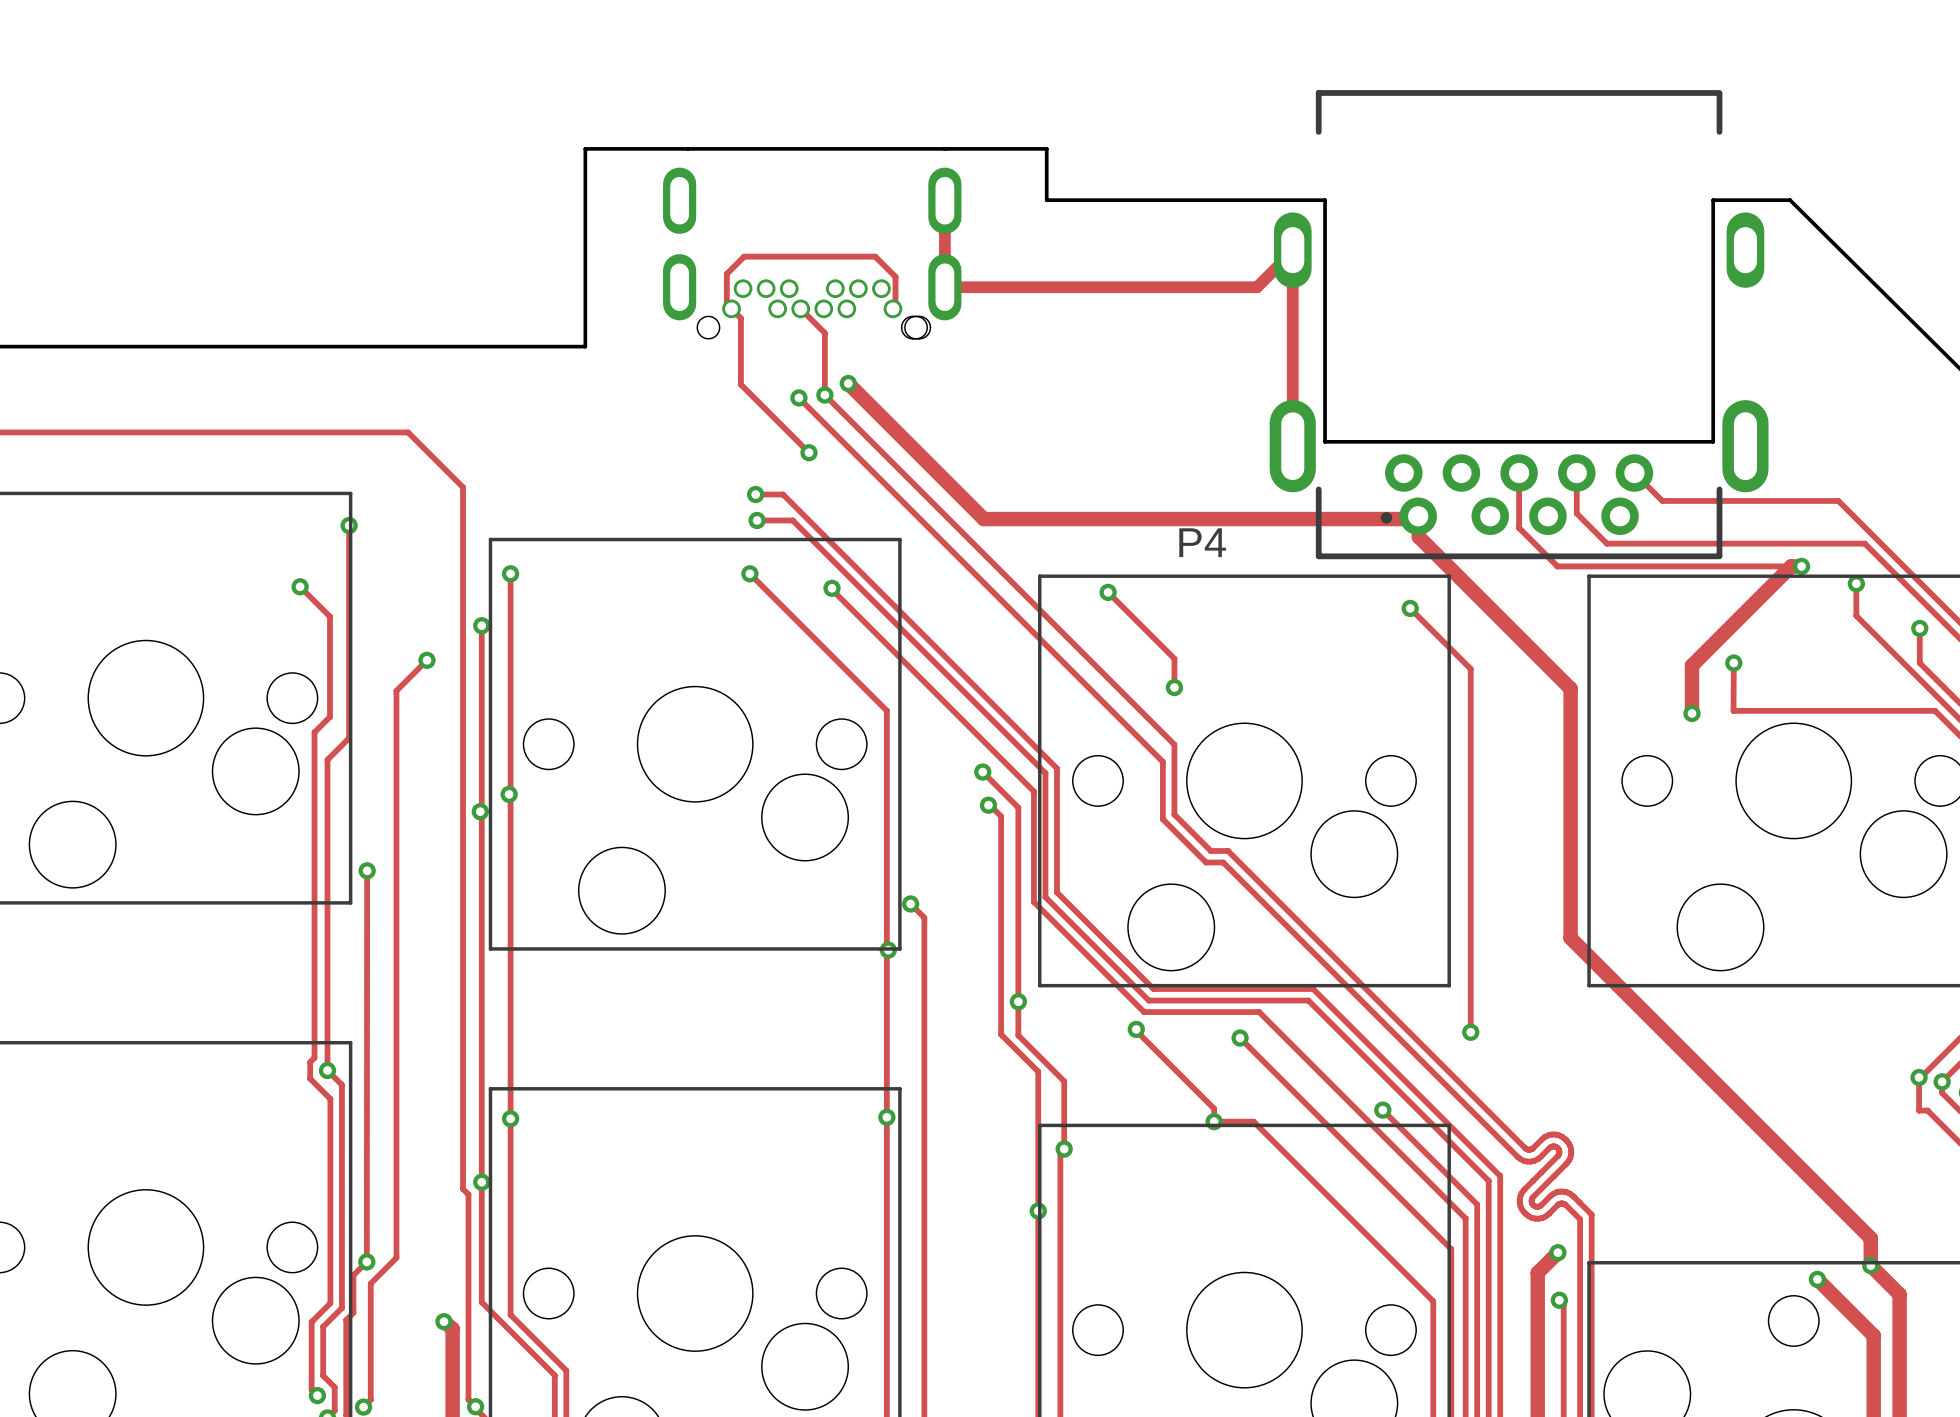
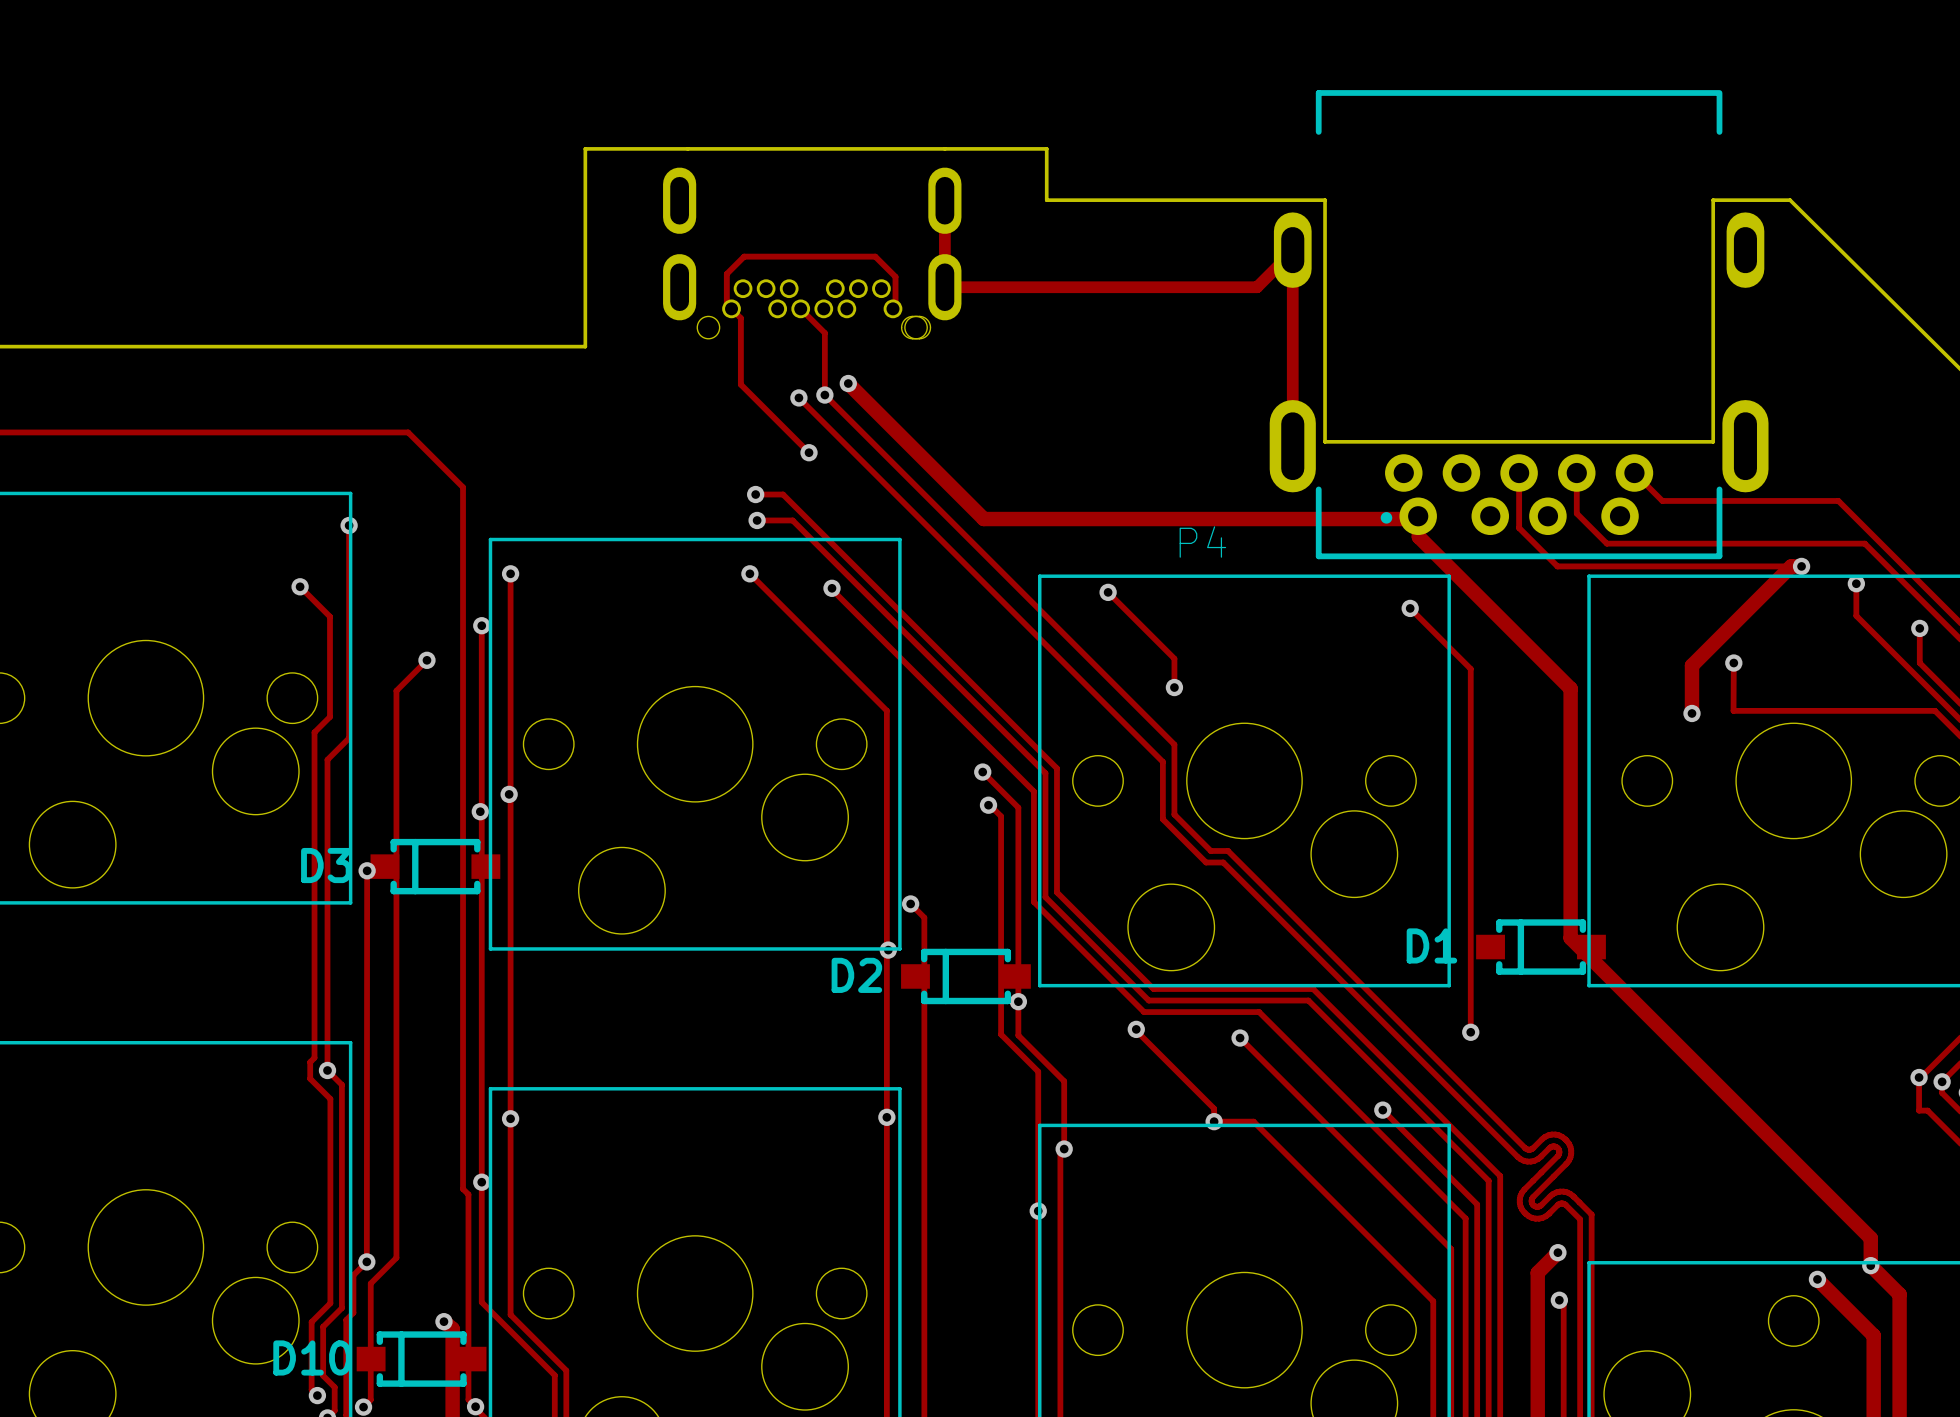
D3: none -> (435, 866)
D1: none -> (1541, 947)
D2: none -> (965, 976)
D10: none -> (421, 1359)

